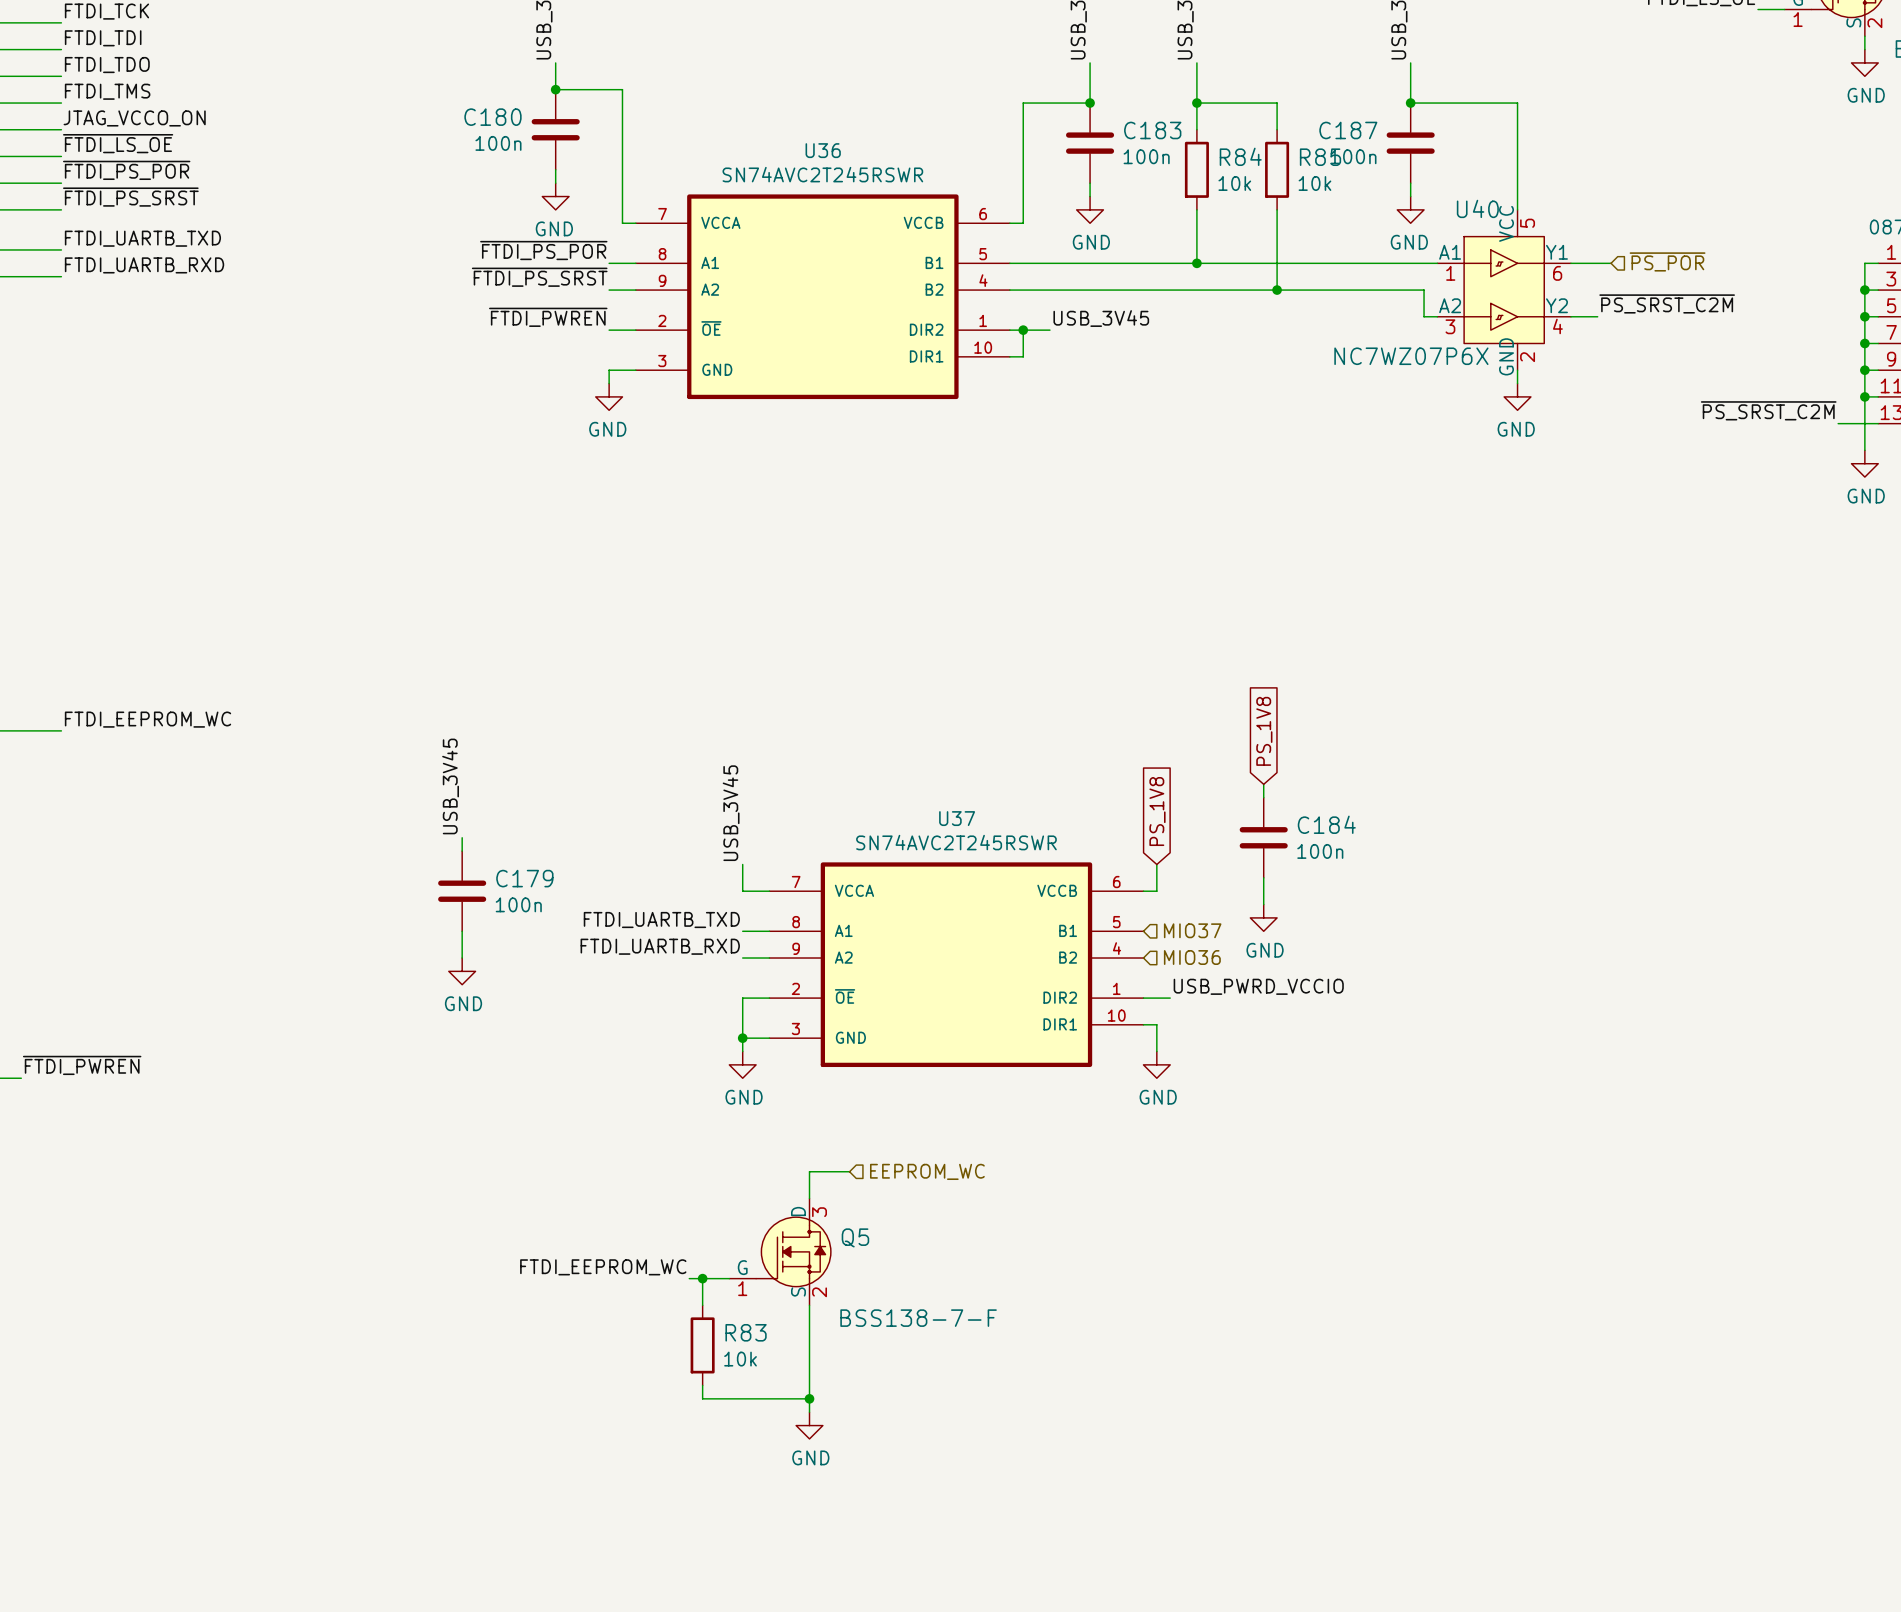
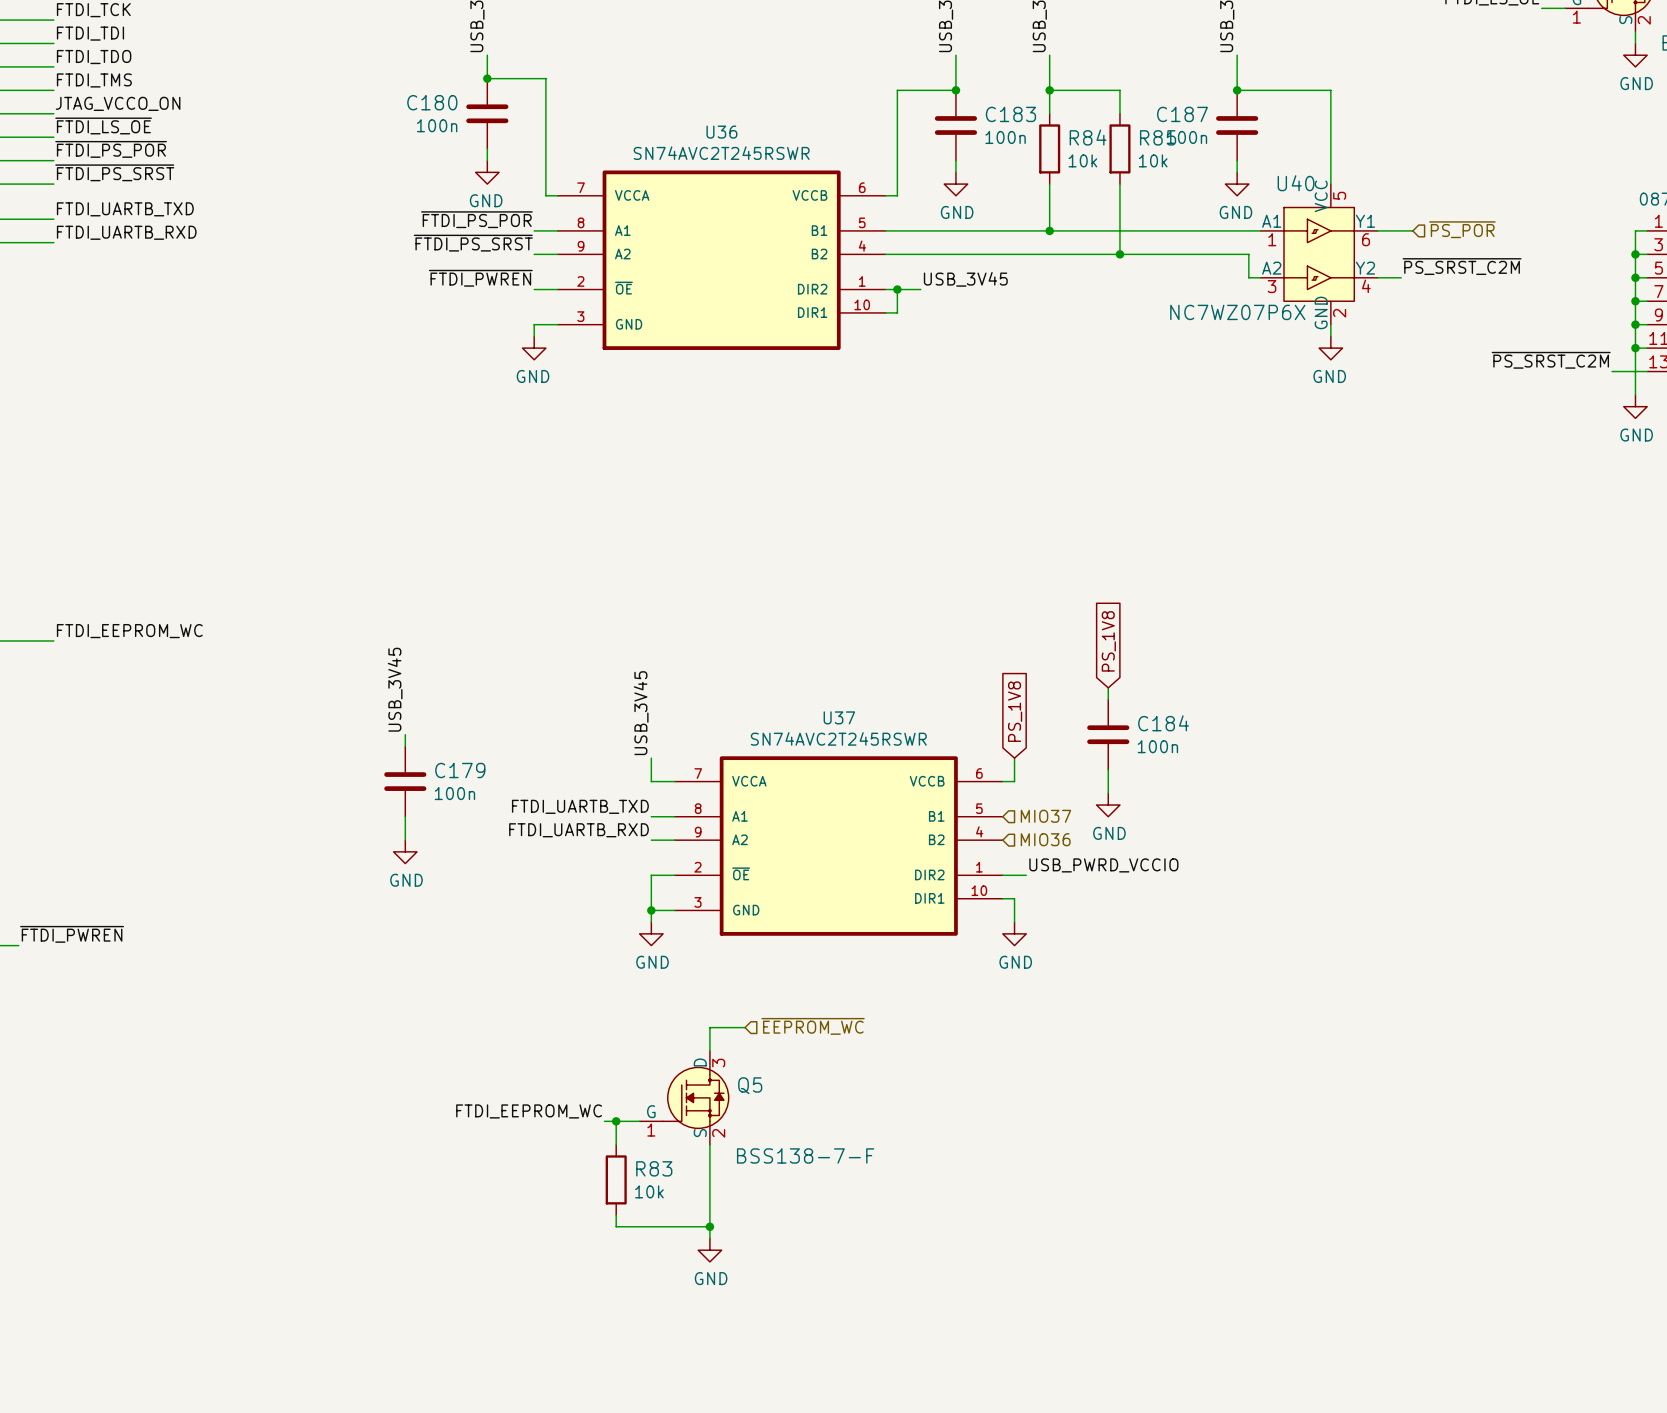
hierarchical label: EEPROM_WC (927, 1171) -> ~{EEPROM_WC} (813, 1026)

